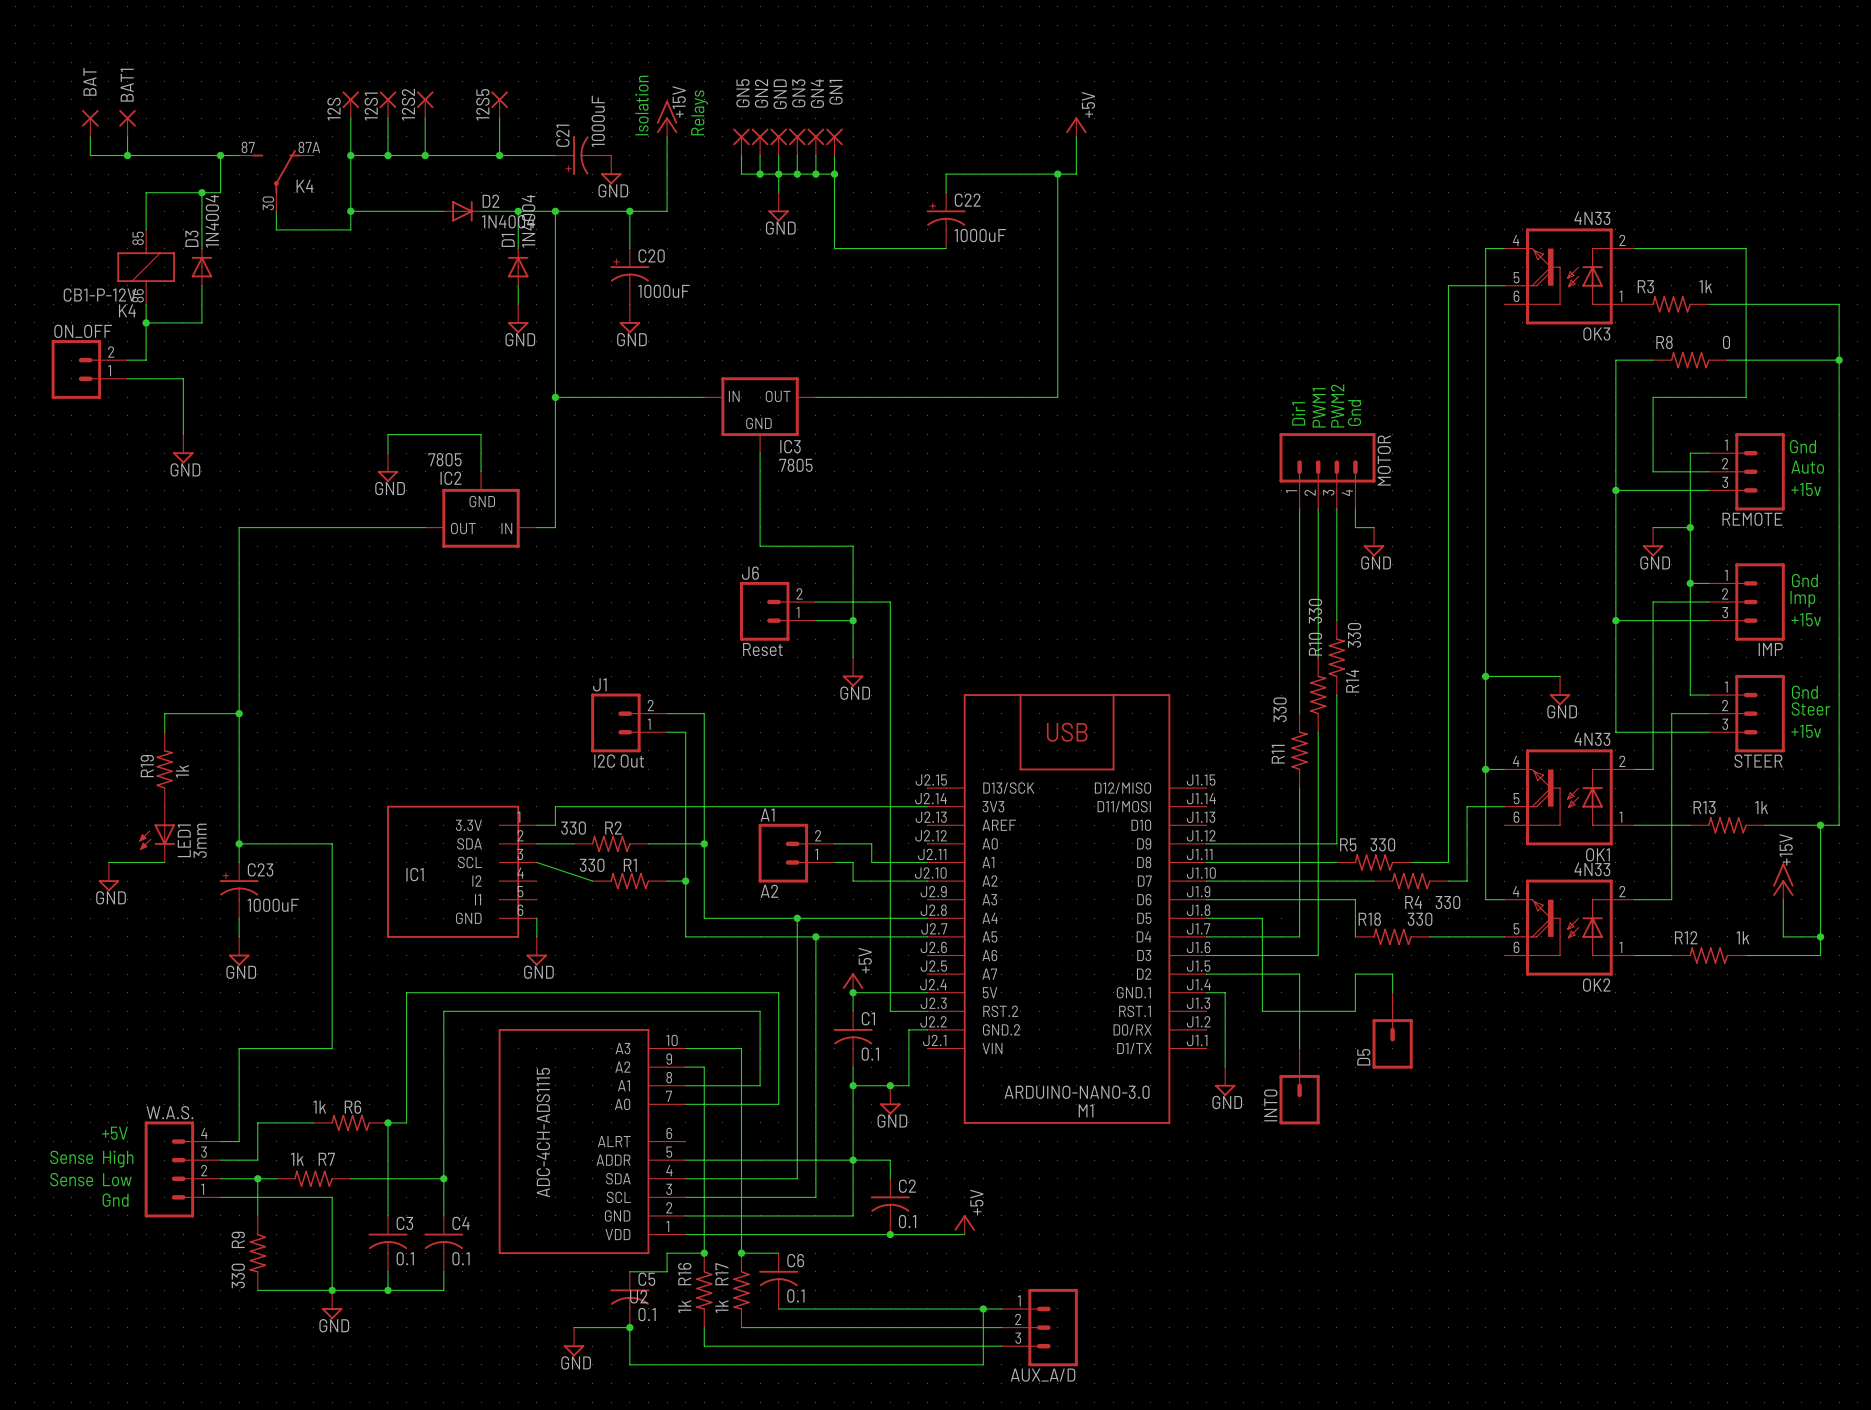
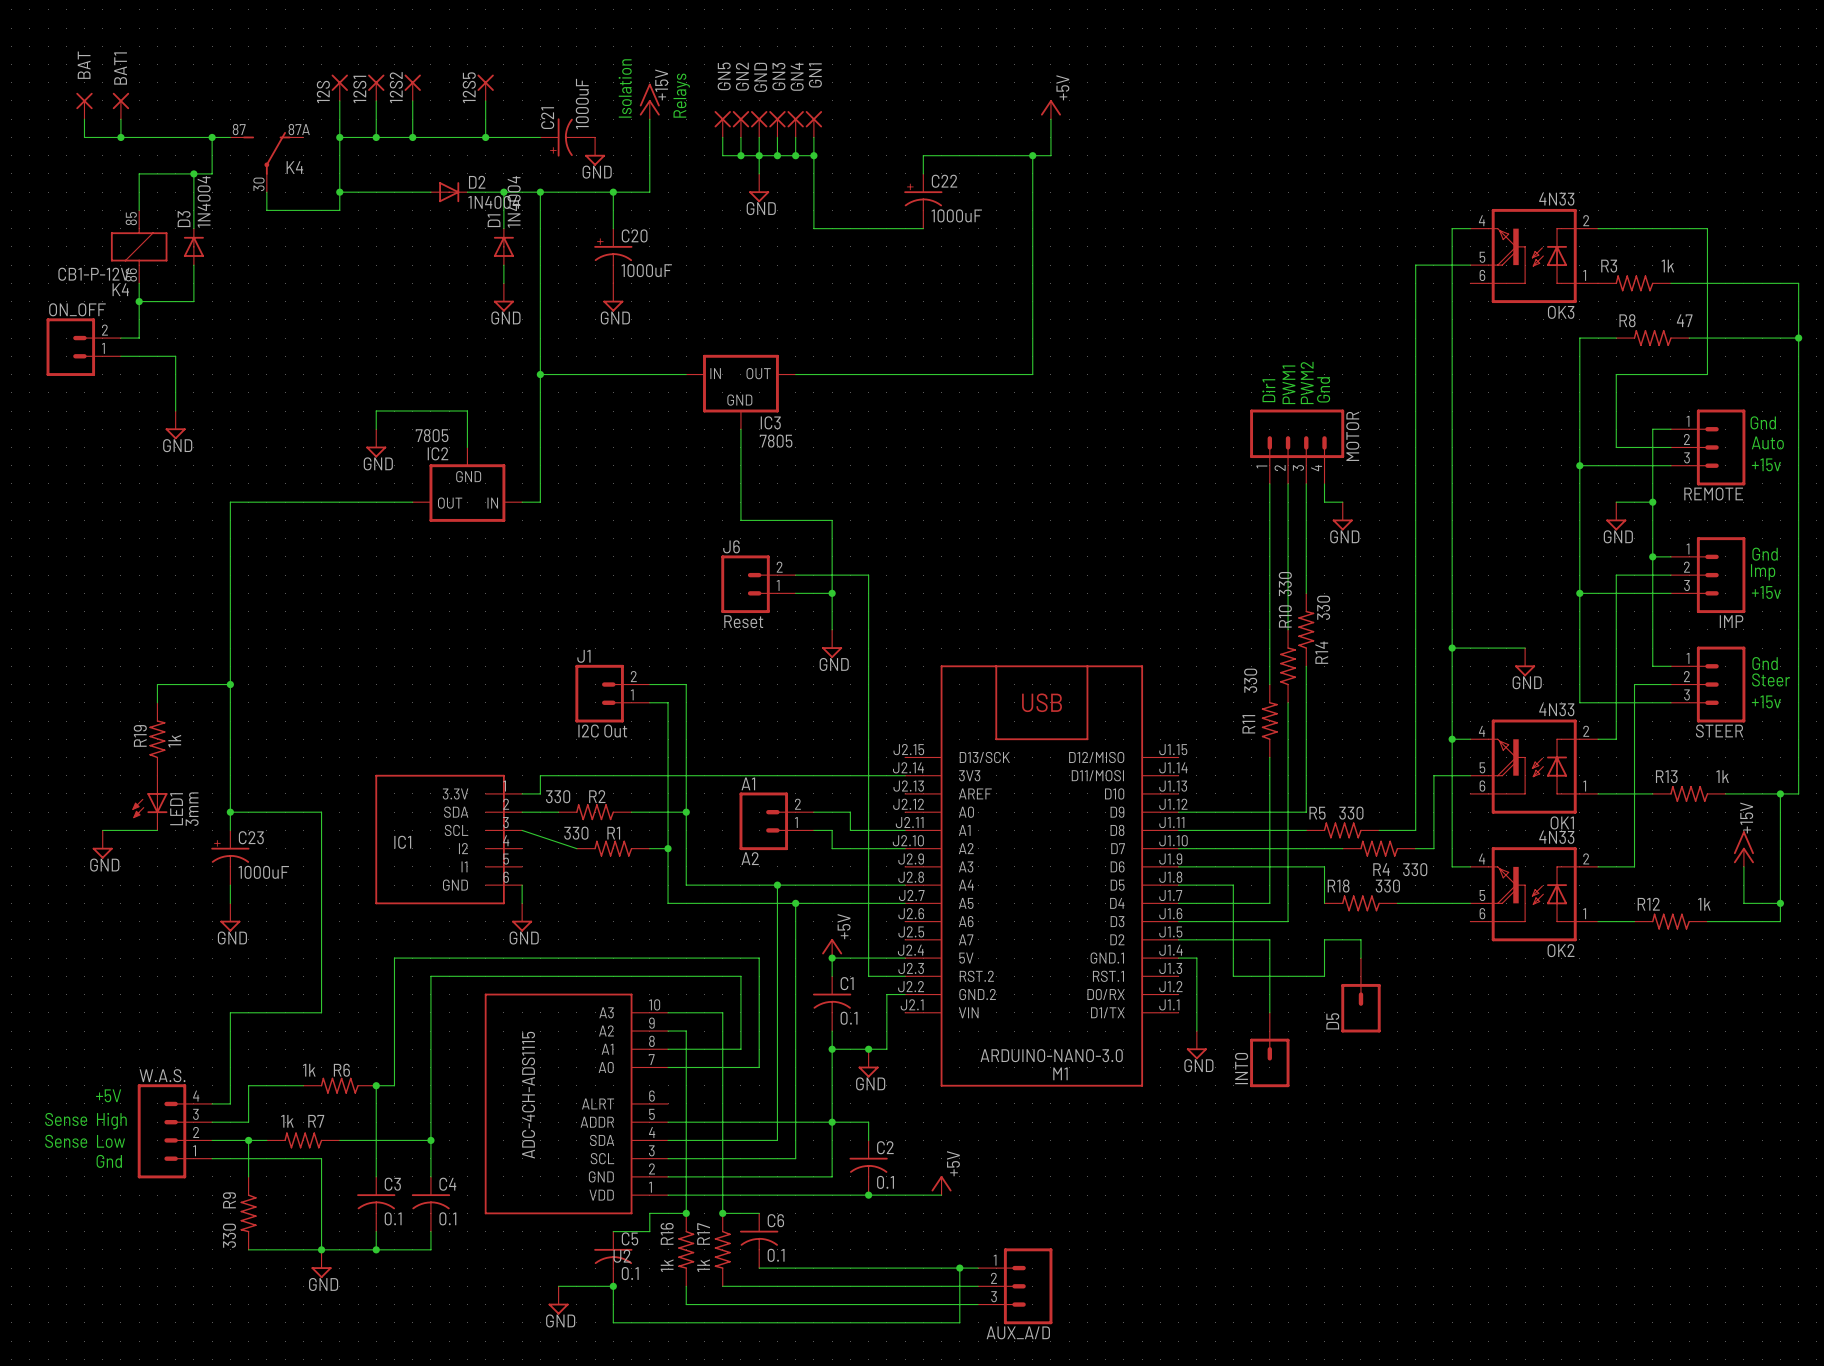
R8 value: 0 (1726, 342) -> 47 (1684, 320)

